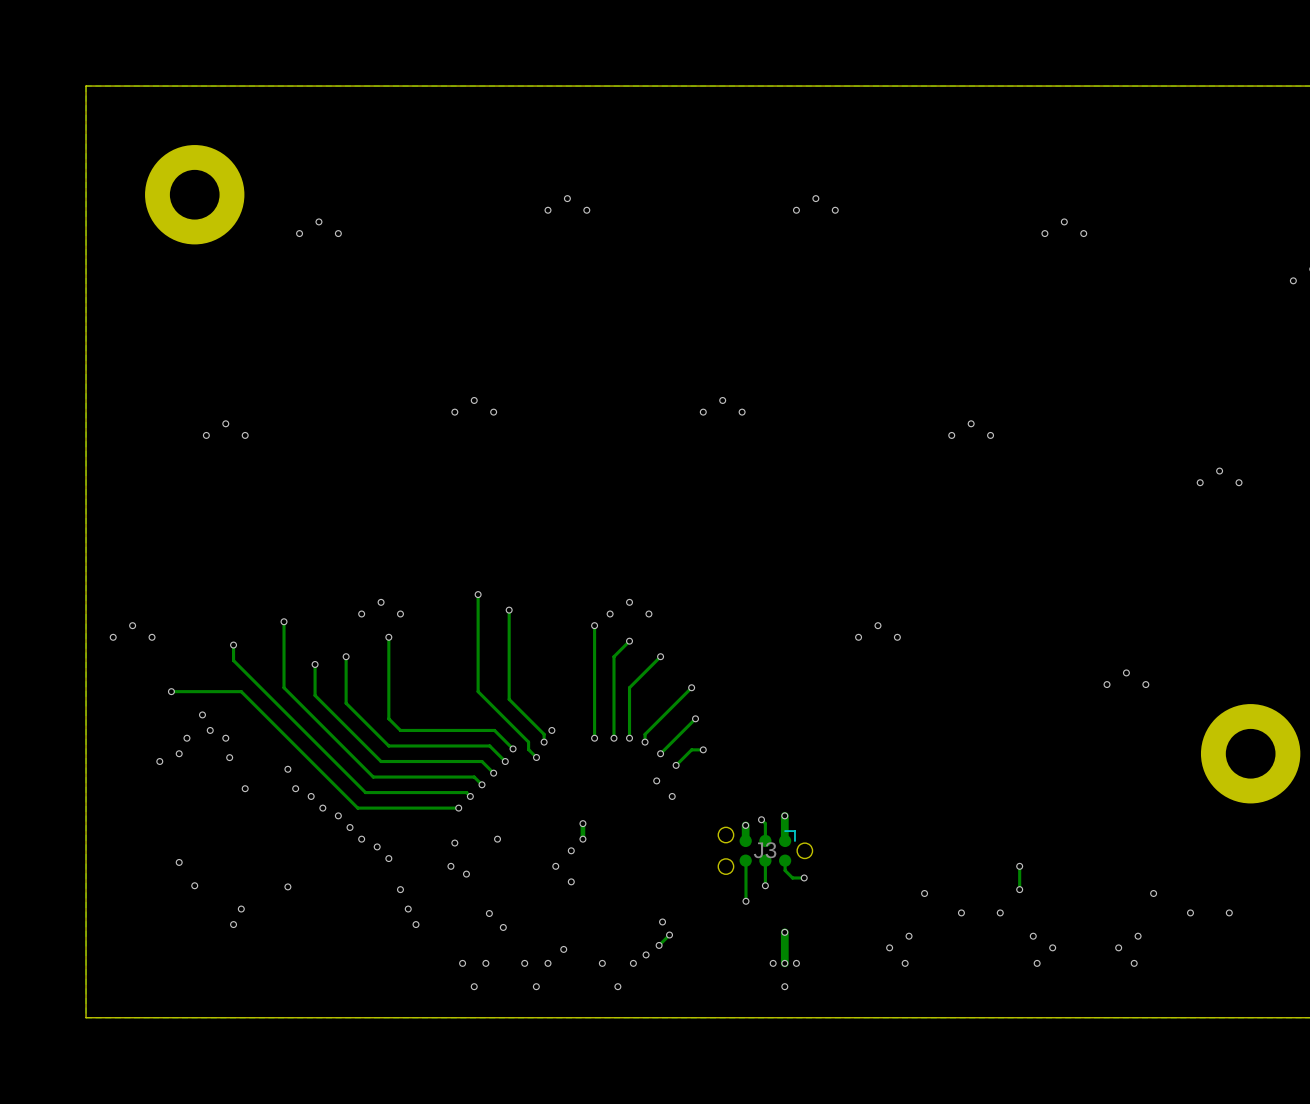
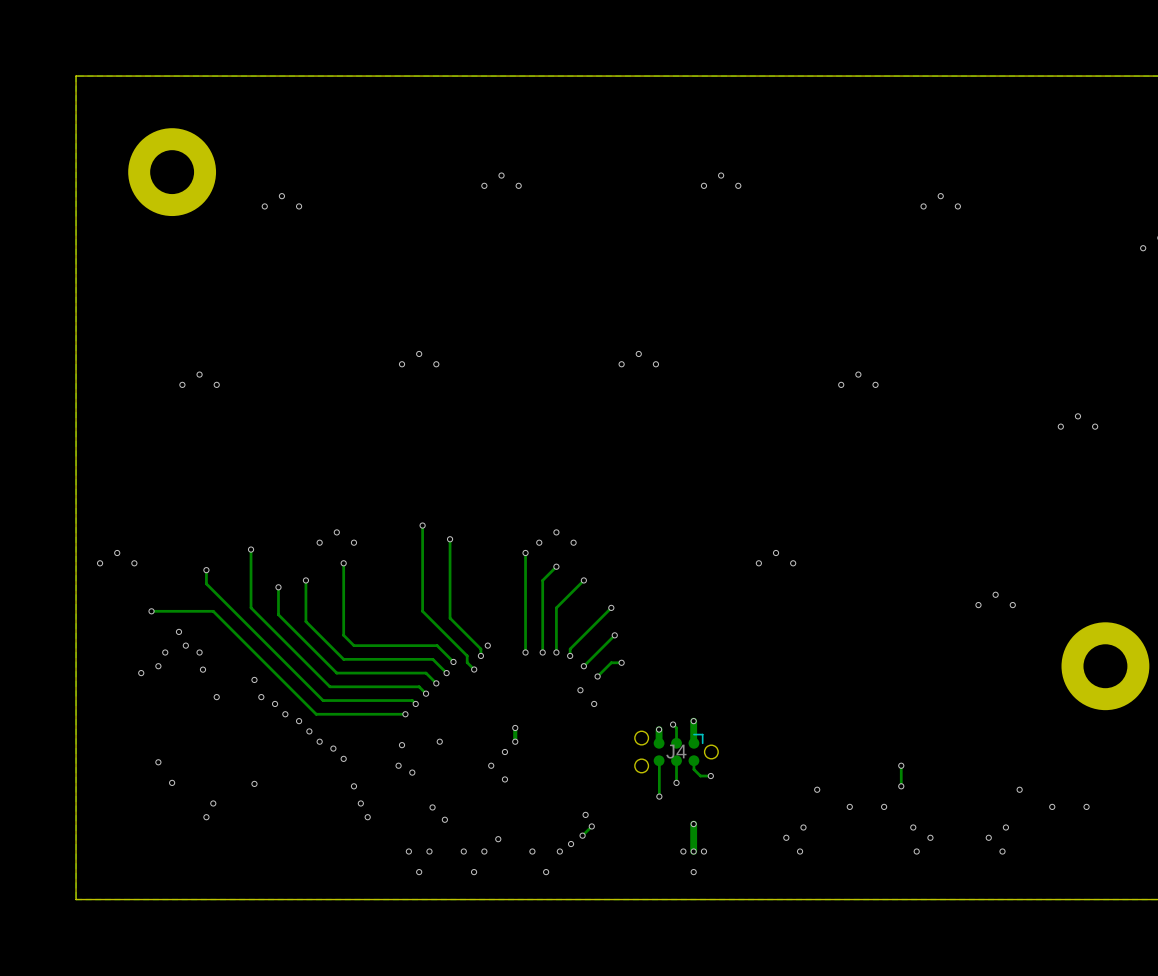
J3 name: J3 (765, 850) -> J4 (676, 751)

